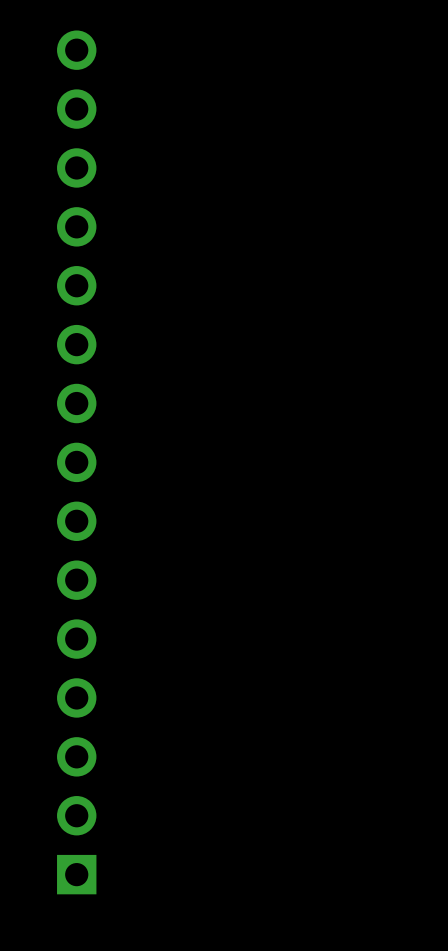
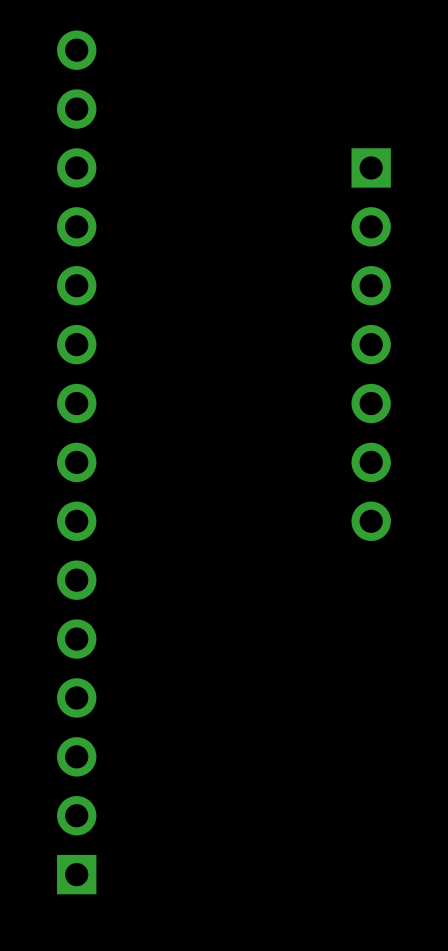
part: none -> (371, 344)

